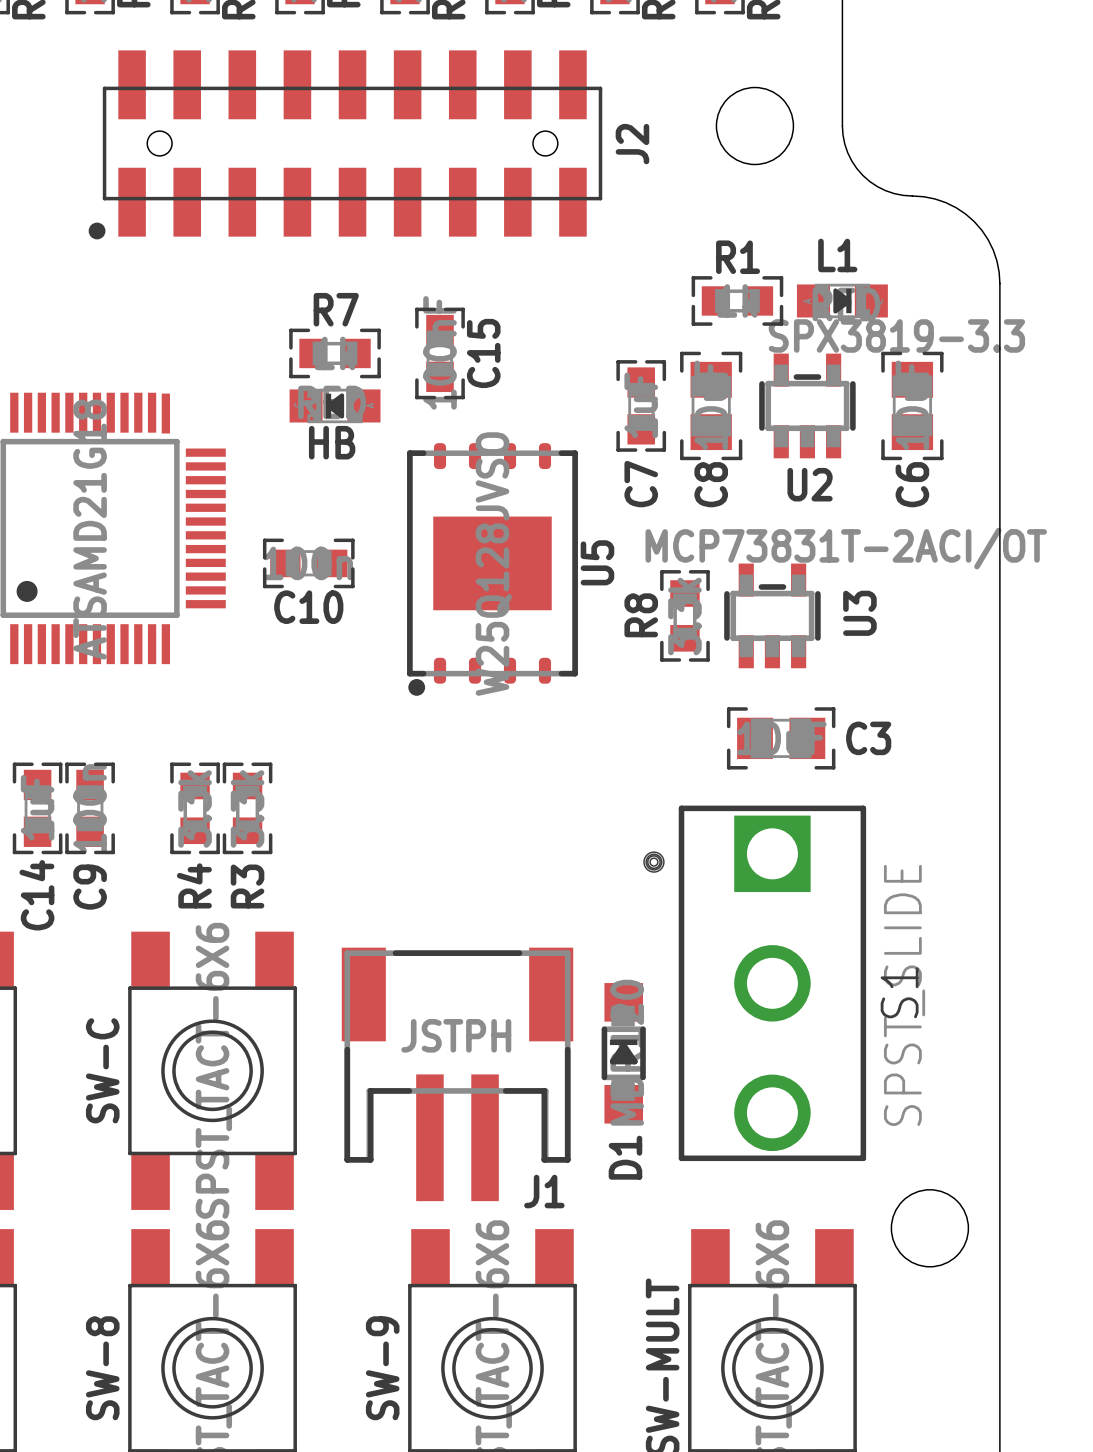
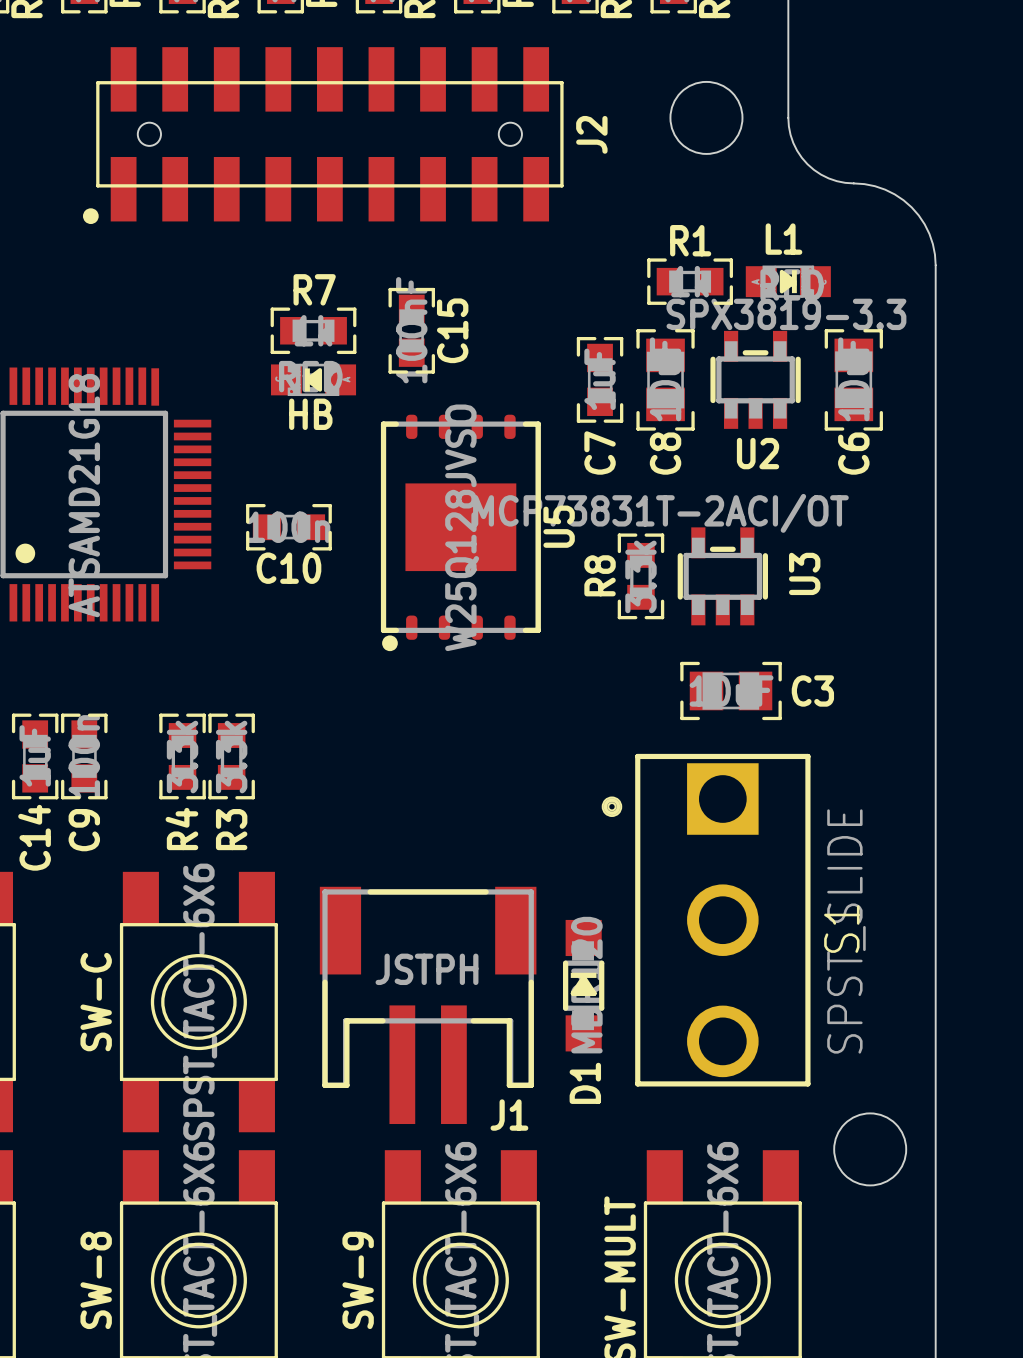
U2 value position: SPX3819-3.3 (896, 335) -> SPX3819-3.3 (786, 314)
U3 value position: MCP73831T-2ACI/OT (846, 548) -> MCP73831T-2ACI/OT (660, 513)

